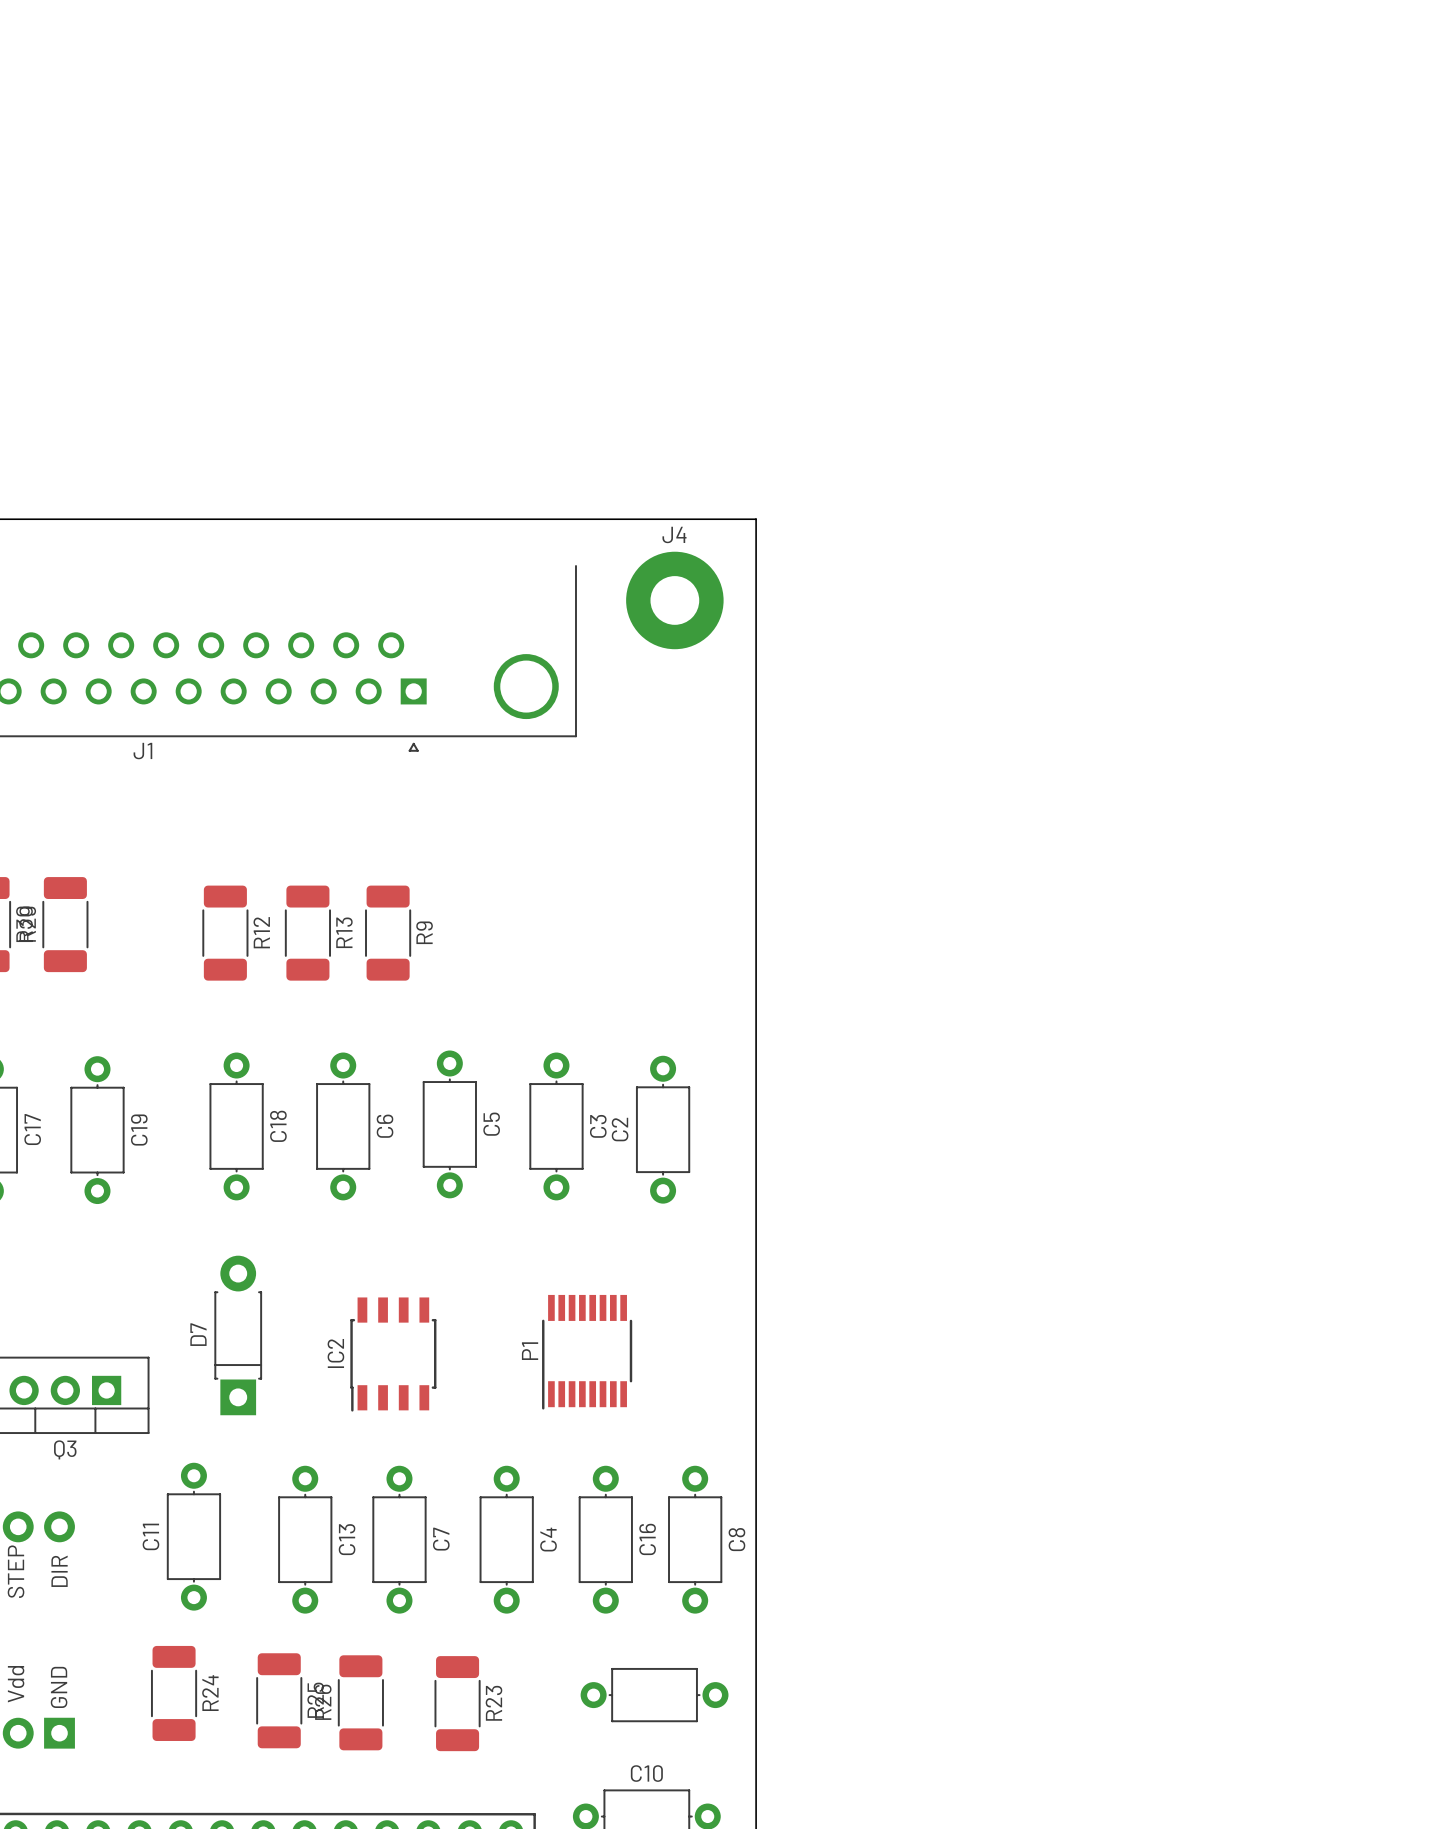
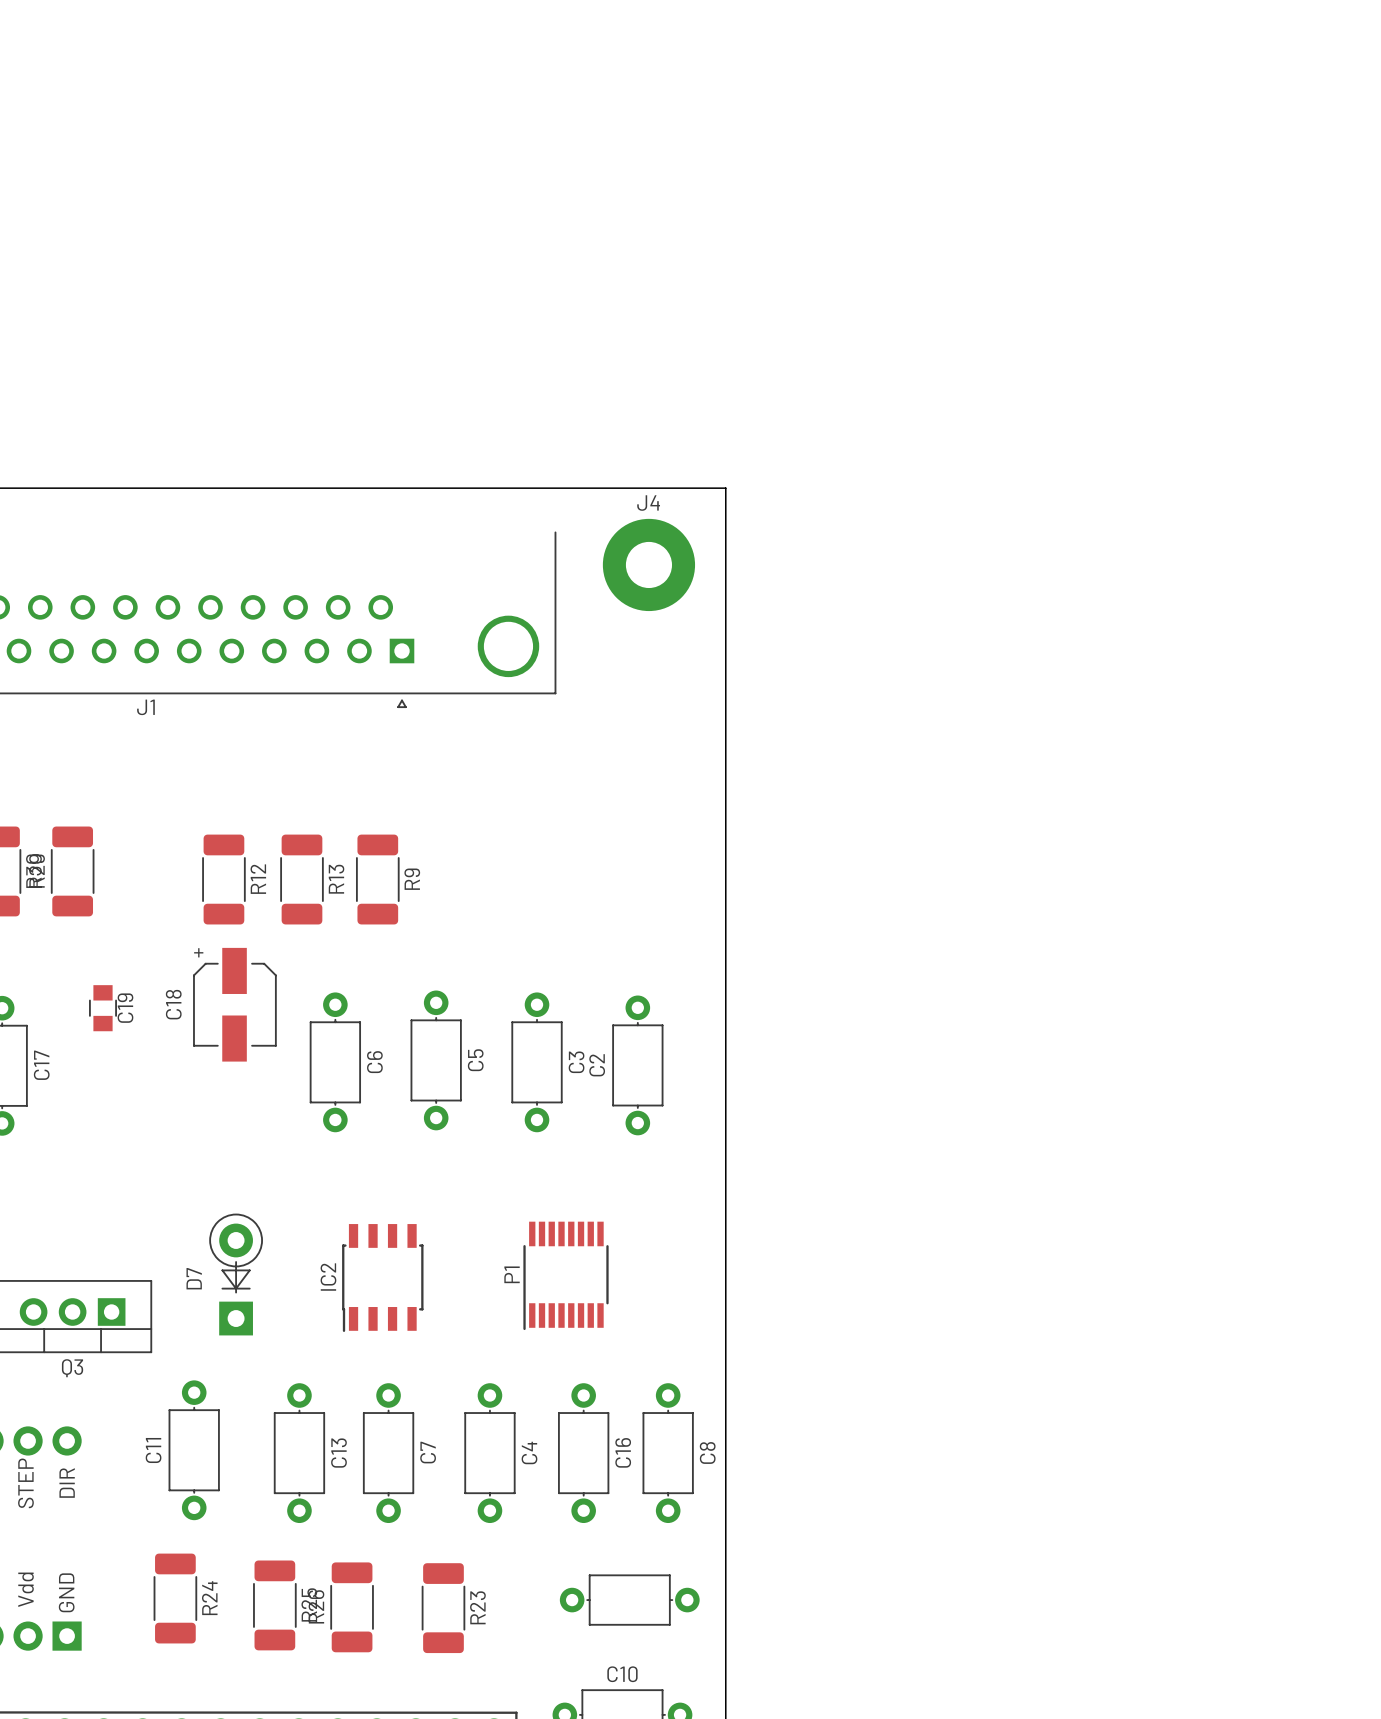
C18 footprint: [209, 1052, 264, 1201] -> [193, 947, 277, 1062]
C19 footprint: [70, 1056, 125, 1205] -> [89, 985, 117, 1032]
C18 name position: C18 (278, 1126) -> C18 (173, 1004)
D7 footprint: [214, 1255, 263, 1416] -> [209, 1213, 263, 1336]

